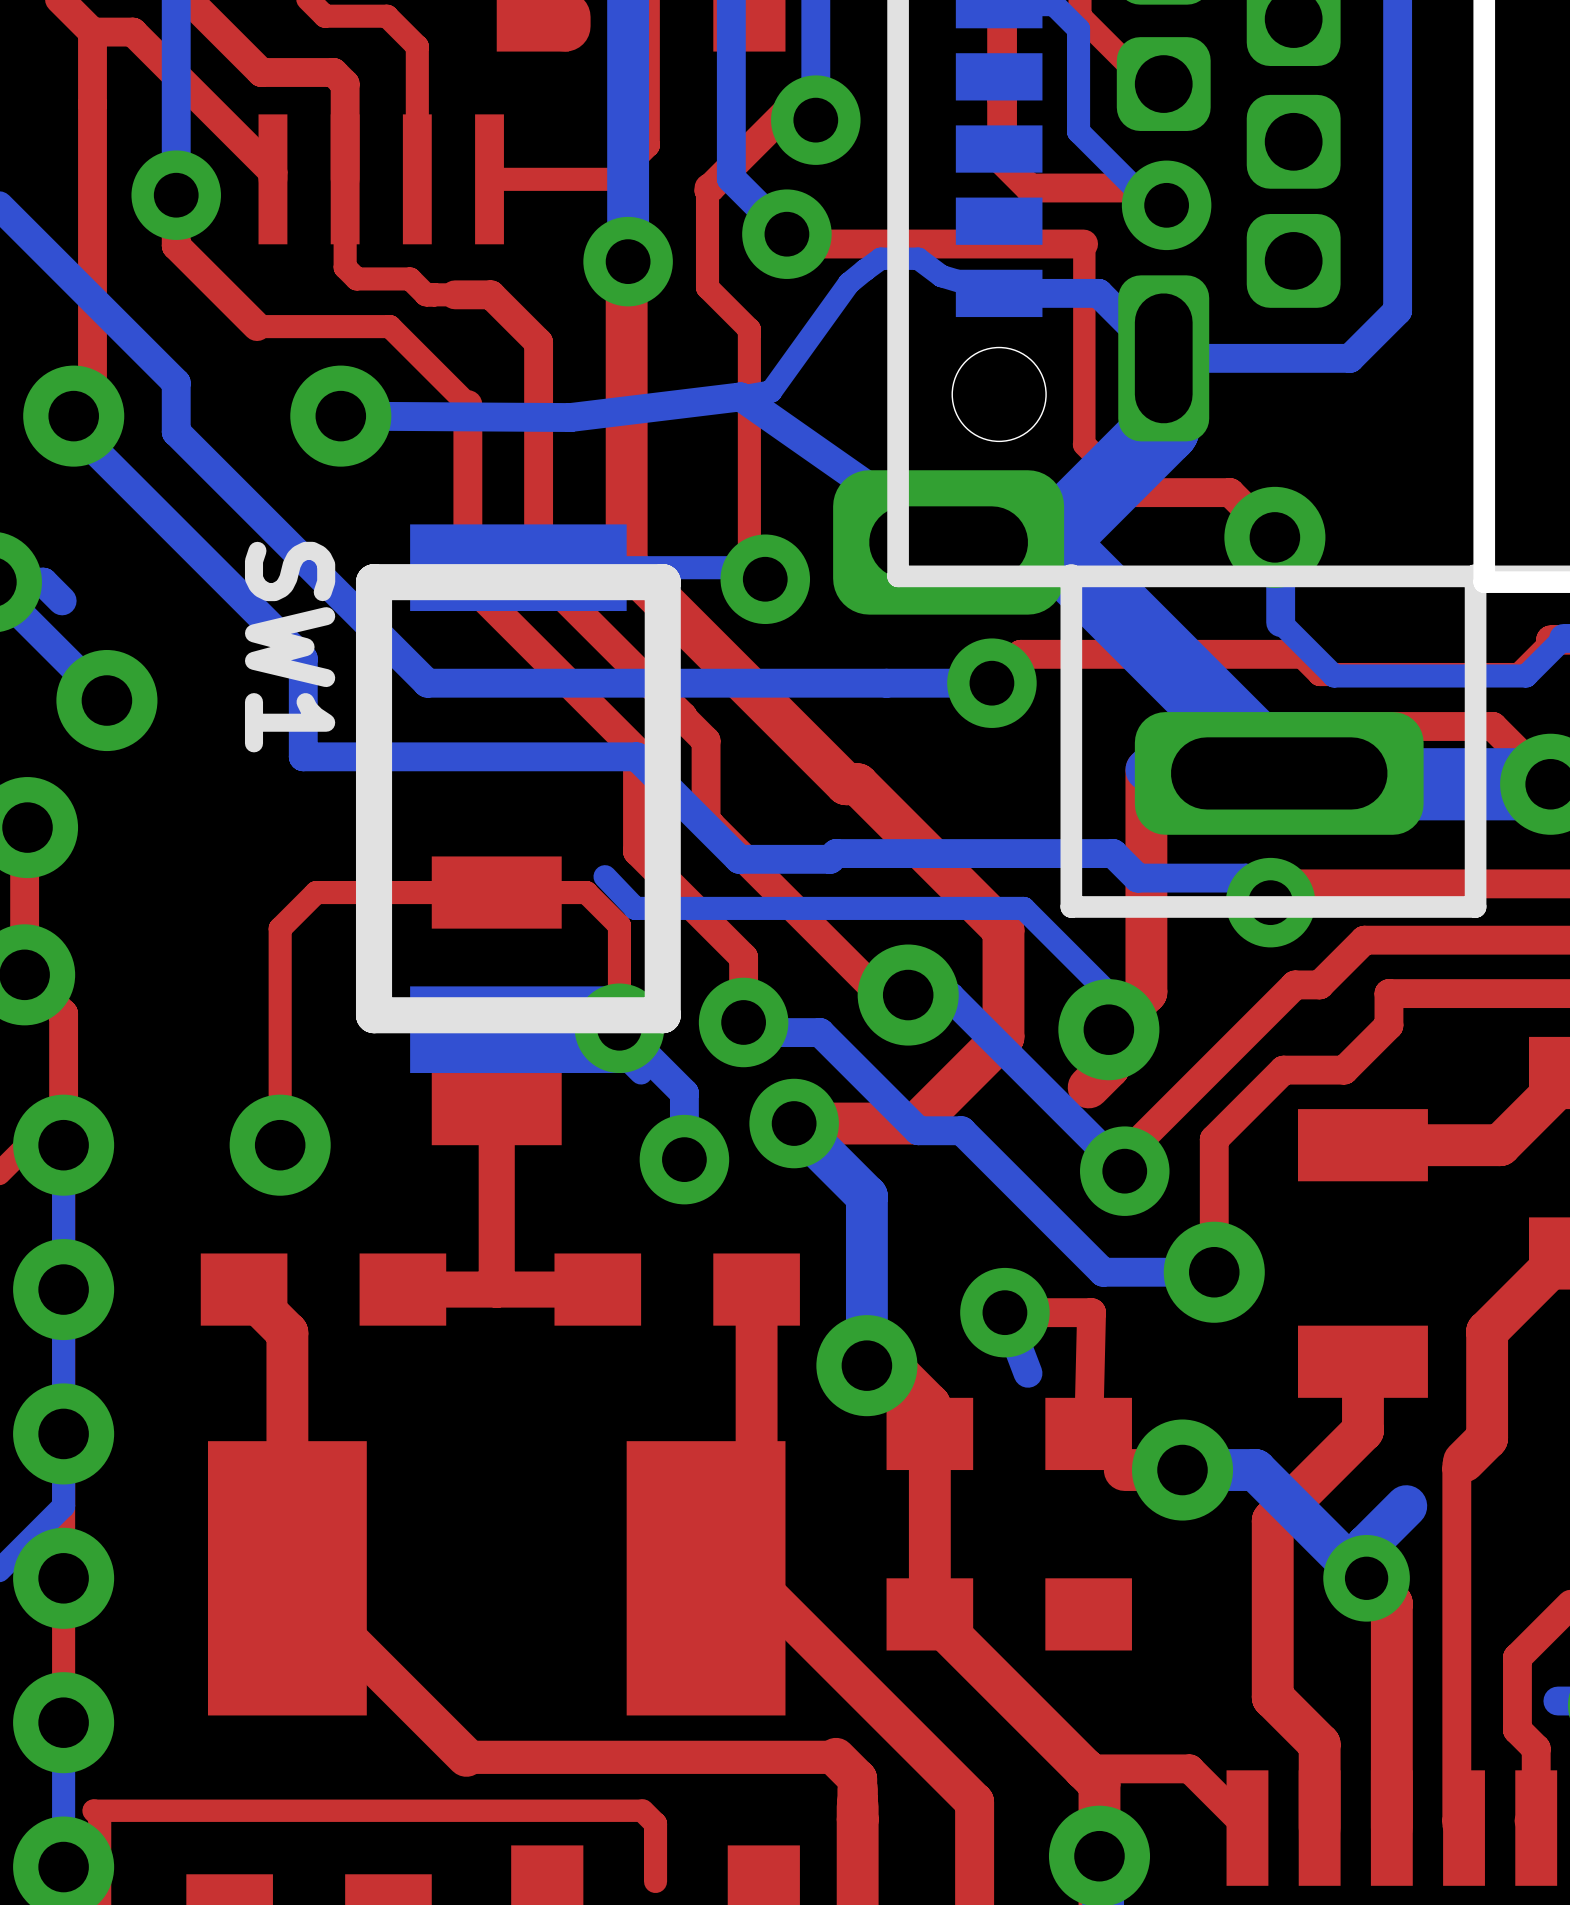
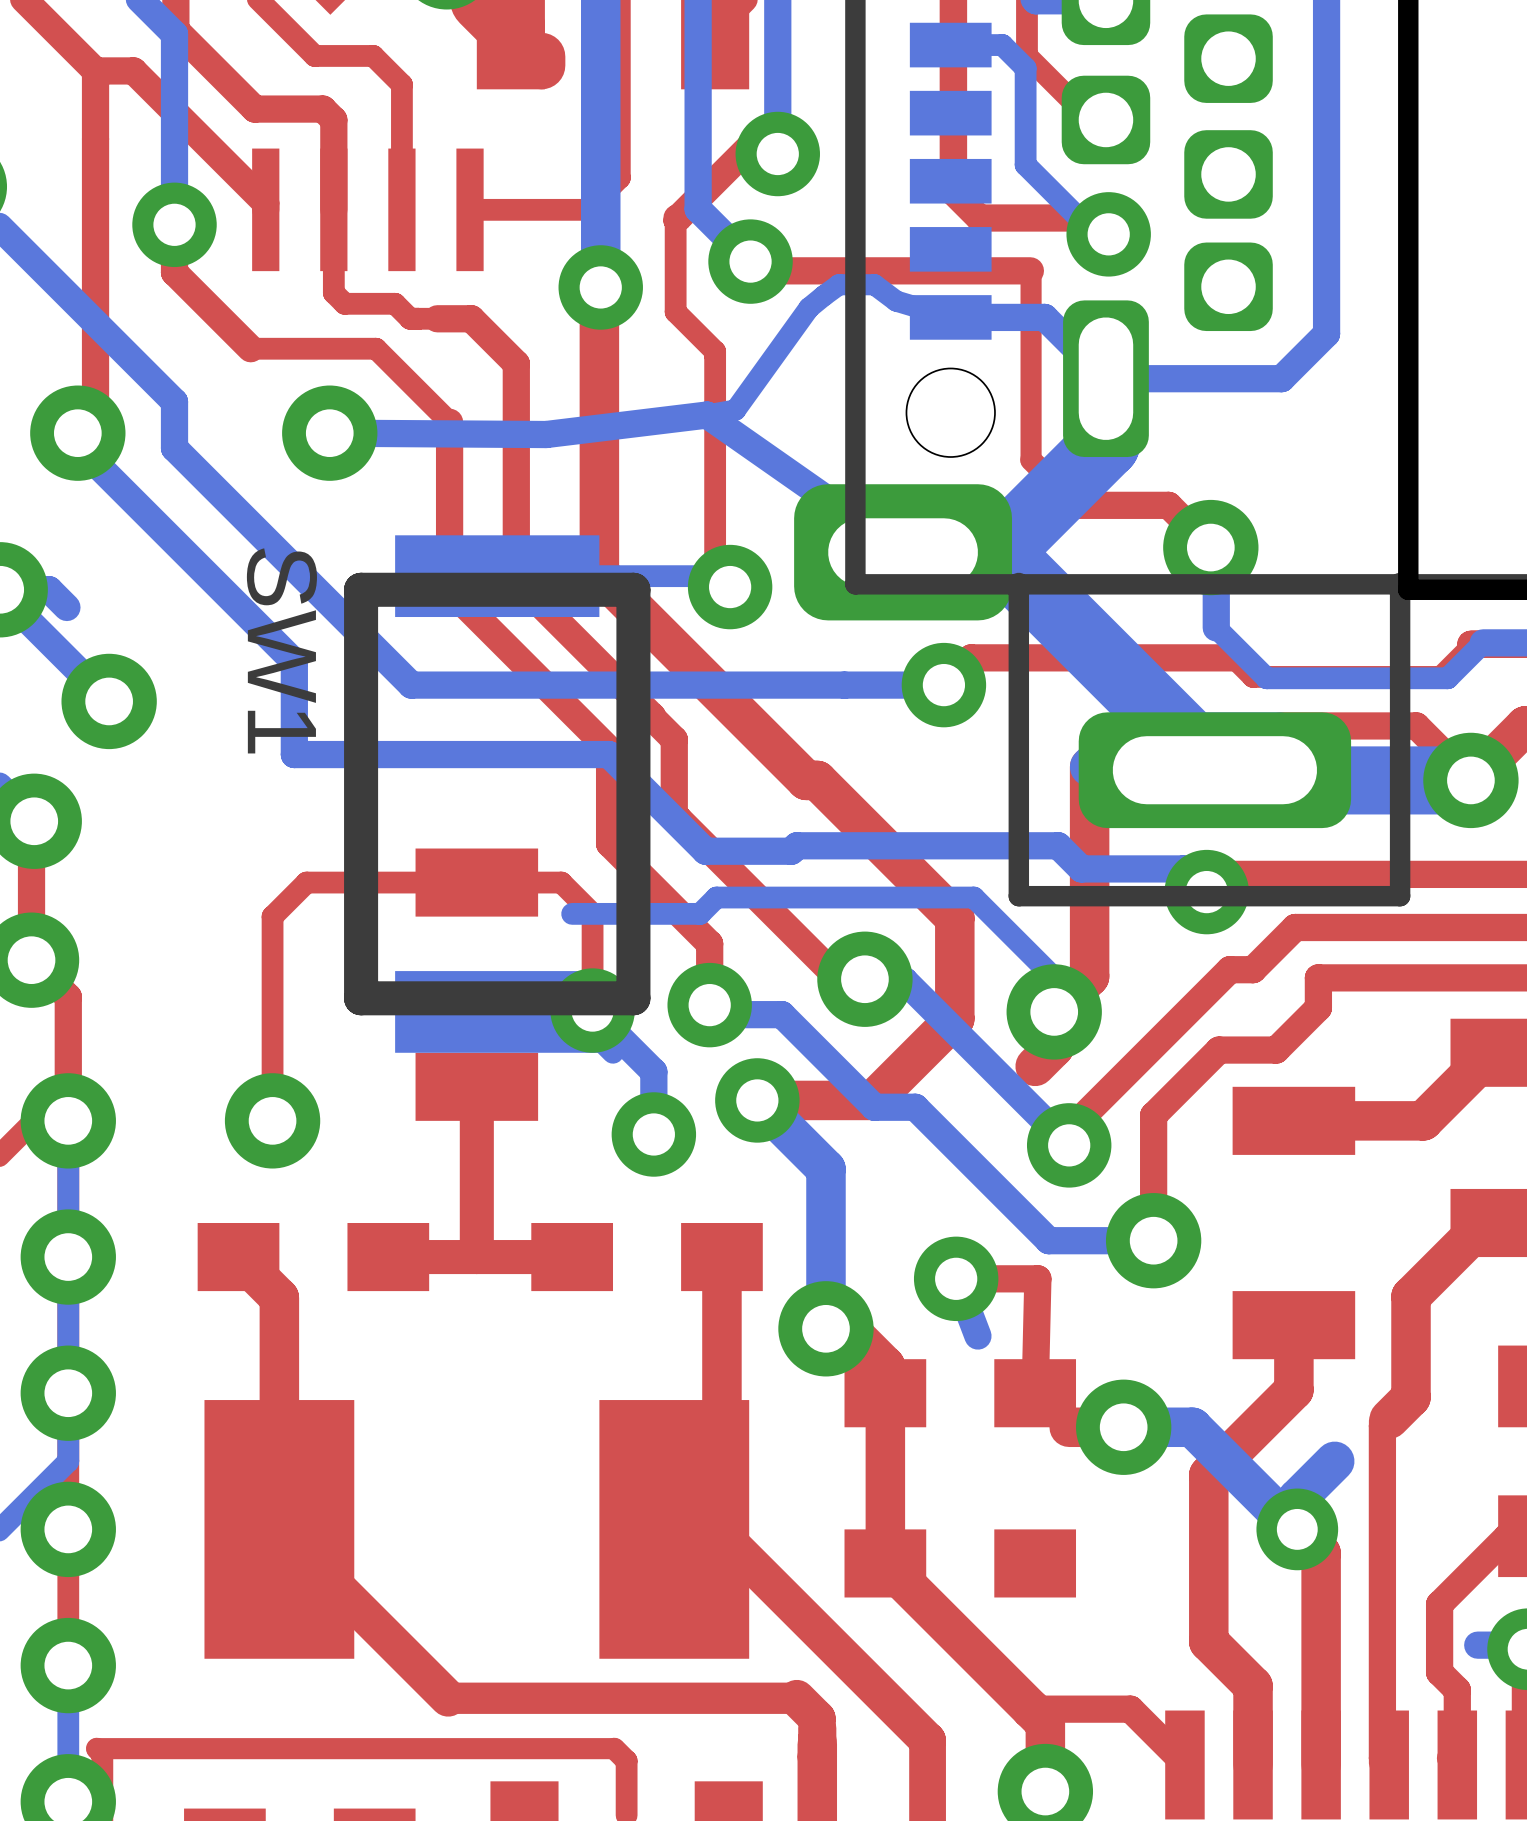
bottom track: (605, 876) (635, 908) (750, 908) -> (572, 913) (700, 913) (716, 897)

